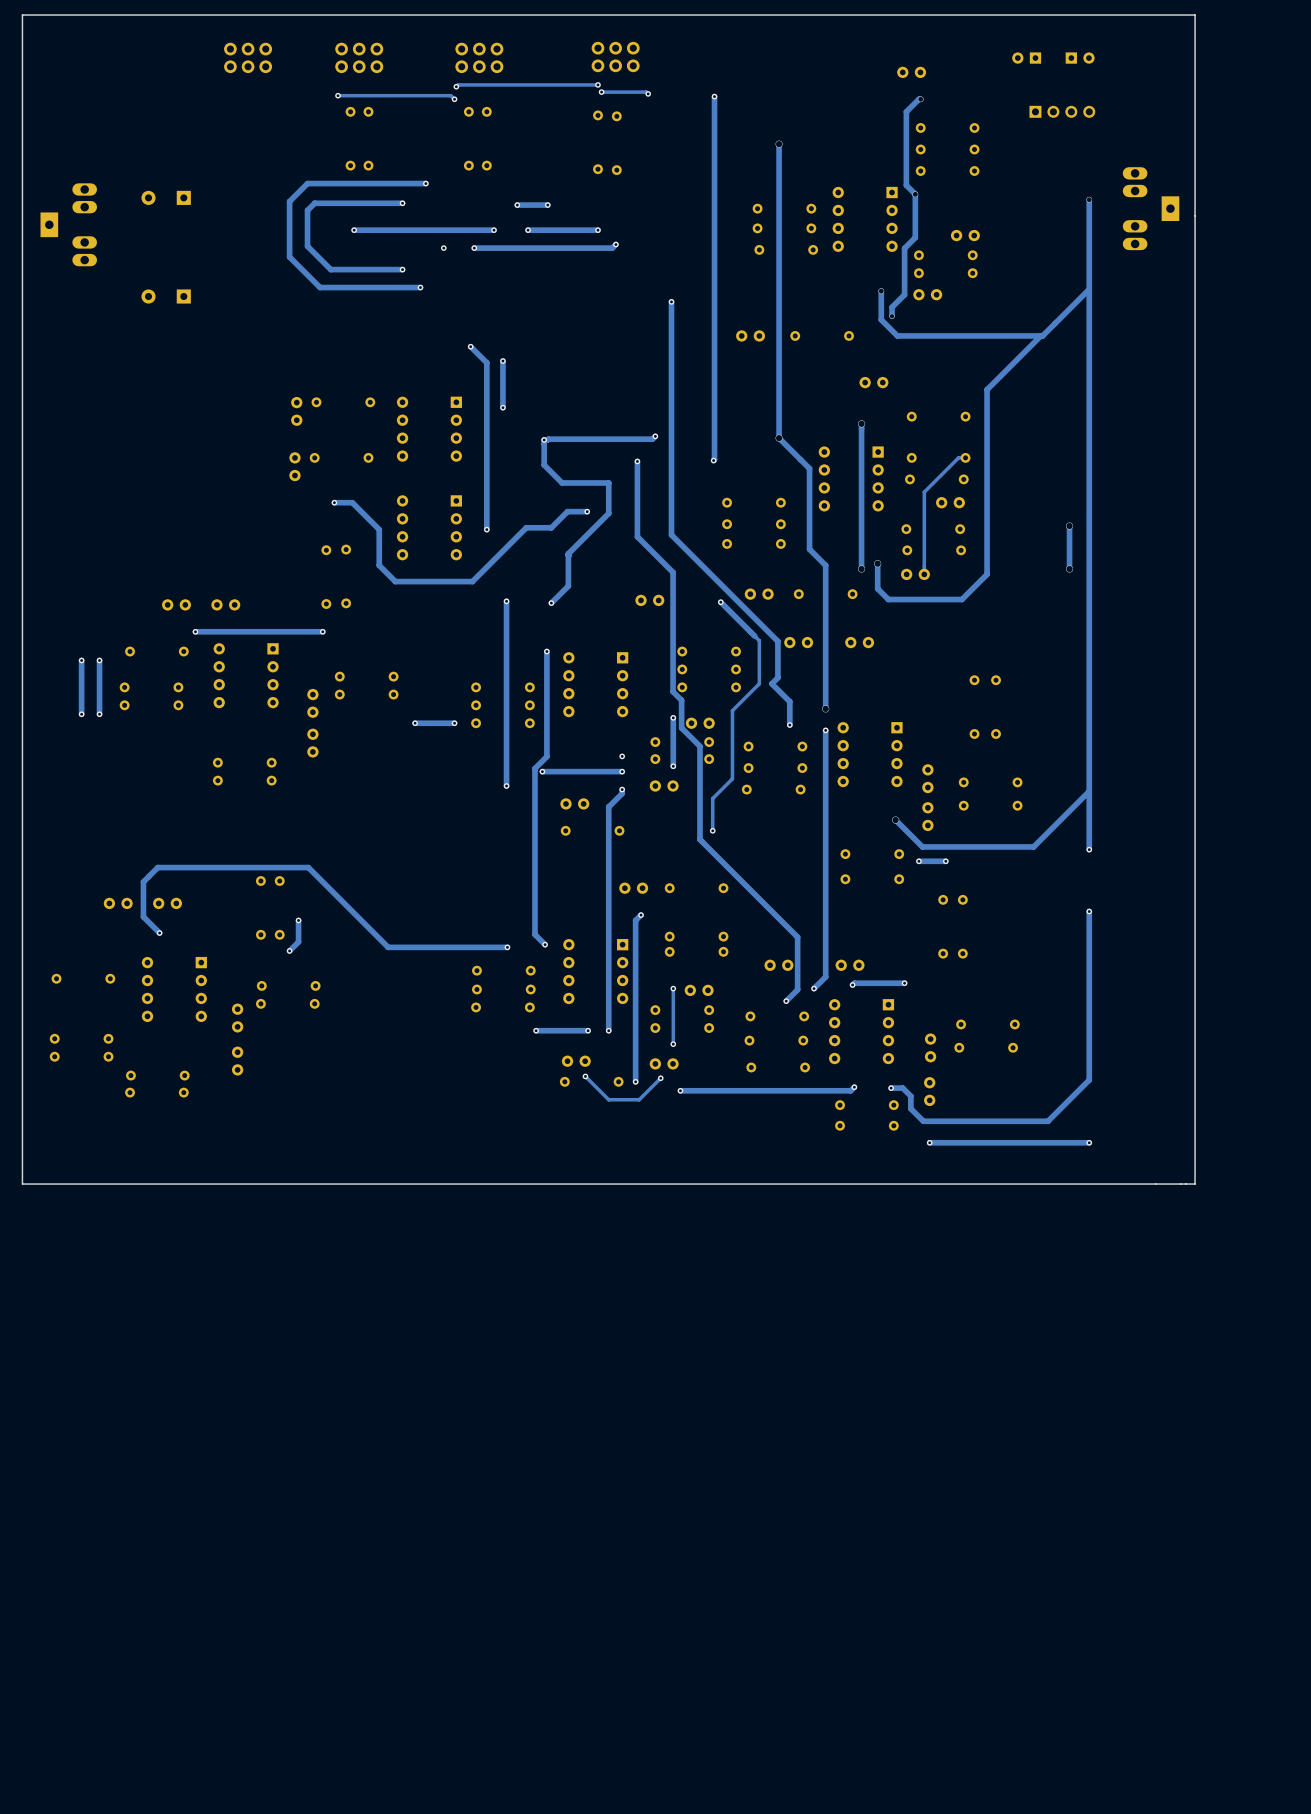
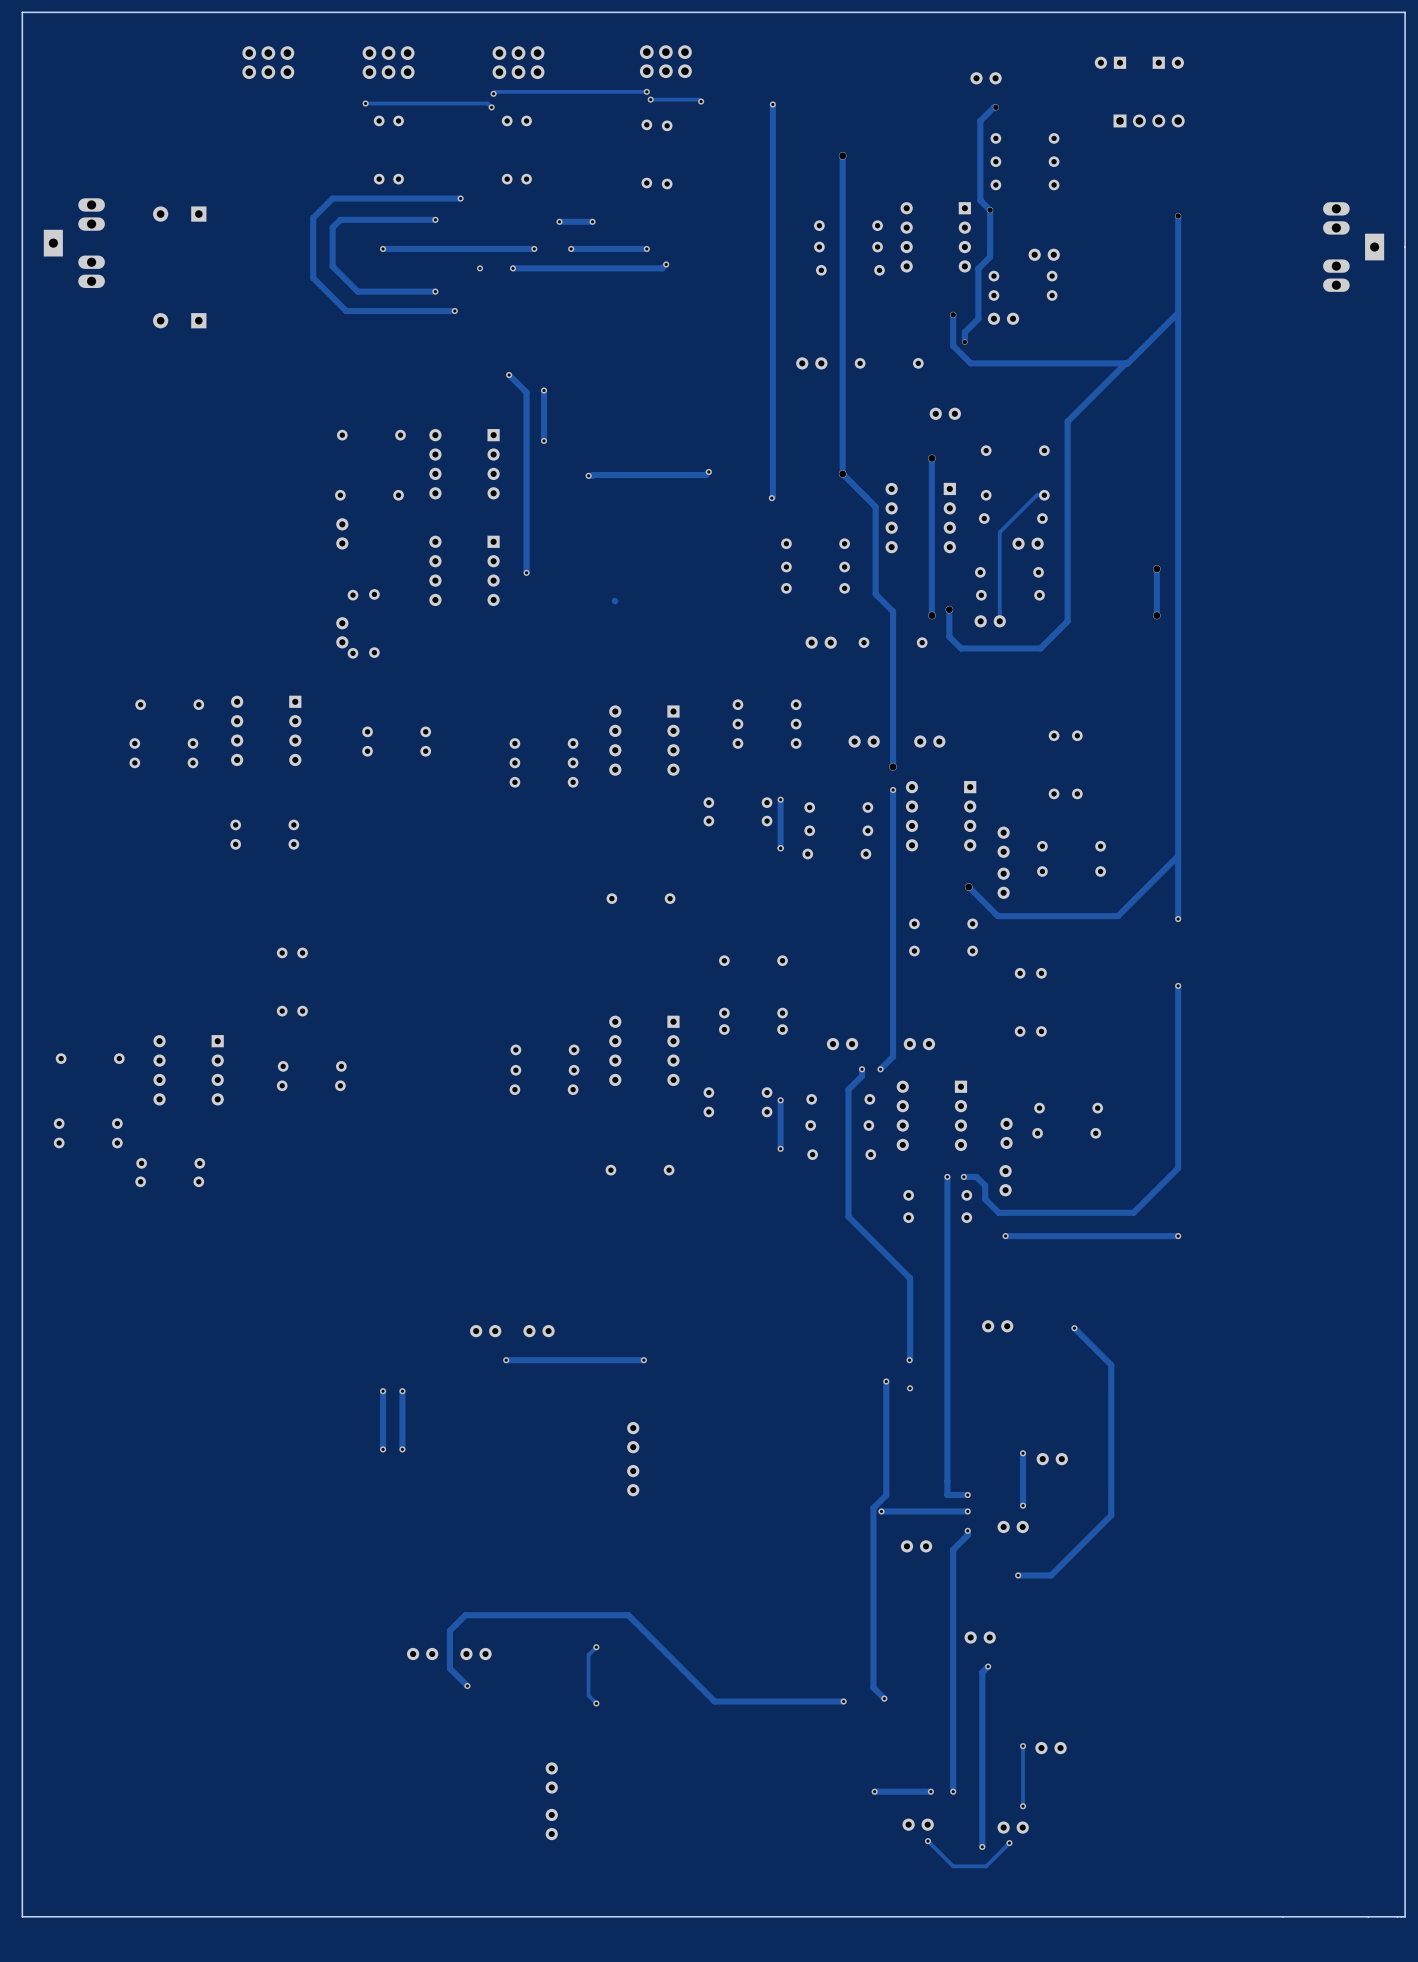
board edge: (1195, 15) (1195, 1184) (22, 1184) (22, 15) (1195, 15) -> (1405, 12) (1405, 1916) (22, 1916) (22, 12) (1405, 12)
part position: (1151, 208) -> (1353, 247)
track: (671, 301) (671, 534) (777, 641) (777, 677) (771, 683) (789, 701) (789, 725) -> none
via: (671, 301) -> none
part: (296, 411) -> none
track: (544, 439) (544, 465) (562, 482) (608, 482) (608, 513) (568, 553) (568, 586) (551, 603) -> none
track: (637, 461) (637, 536) (673, 572) (673, 691) (681, 700) (681, 727) (699, 746) (699, 839) (797, 937) (797, 989) (786, 1001) -> none
via: (637, 461) -> none
part position: (294, 466) -> (342, 533)
track: (334, 502) (352, 502) (379, 529) (379, 565) (395, 581) (472, 581) (526, 527) (551, 527) (567, 511) (587, 511) -> none
via: (334, 502) -> none
via: (587, 511) -> none
part: none -> (342, 632)
part: (649, 600) -> none
track: (506, 601) (506, 785) -> none
via: (506, 601) -> none
track: (720, 602) (754, 636) -> none
via: (720, 602) -> none
via: (551, 603) -> none
part: (176, 604) -> none
part: (225, 604) -> none
via: (195, 631) -> none
track: (322, 631) (195, 631) -> none
via: (322, 631) -> none
track: (750, 631) (759, 640) (759, 683) (732, 710) (732, 778) (712, 798) (712, 830) -> none
part: (798, 642) -> none
part: (859, 642) -> none
track: (546, 651) (546, 756) (534, 768) (534, 934) (545, 944) -> none
via: (546, 651) -> none
track: (81, 660) (81, 714) -> none
via: (81, 660) -> none
track: (99, 660) (99, 714) -> none
via: (99, 660) -> none
part: none -> (864, 741)
part: none -> (929, 741)
part: (312, 703) -> none
via: (81, 714) -> none
via: (99, 714) -> none
track: (673, 717) (673, 766) -> none
via: (673, 717) -> none
via: (415, 723) -> none
track: (454, 723) (415, 723) -> none
via: (454, 723) -> none
part: (700, 723) -> none
via: (789, 725) -> none
track: none -> (780, 799) (780, 848)
via: none -> (780, 799)
part: (312, 743) -> none
via: (622, 756) -> none
via: (673, 766) -> none
via: (542, 771) -> none
track: (622, 771) (542, 771) -> none
via: (622, 771) -> none
via: none -> (780, 848)
via: (506, 785) -> none
part: (664, 785) -> none
track: (622, 789) (622, 793) (608, 807) (608, 1030) -> none
via: (622, 789) -> none
part: (574, 803) -> none
via: (712, 830) -> none
via: (918, 861) -> none
track: (945, 861) (918, 861) -> none
via: (945, 861) -> none
part: (633, 888) -> none
part: (118, 903) -> none
part: (167, 903) -> none
track: (641, 915) (635, 920) (635, 1081) -> none
via: (641, 915) -> none
track: (298, 920) (298, 941) (289, 950) -> none
via: (298, 920) -> none
track: (159, 933) (143, 916) (143, 881) (157, 867) (308, 867) (388, 947) (507, 947) -> none
via: (159, 933) -> none
via: (545, 944) -> none
via: (507, 947) -> none
via: (289, 950) -> none
track: (904, 983) (854, 983) (852, 985) -> none
via: (904, 983) -> none
via: (852, 985) -> none
track: (673, 988) (673, 1044) -> none
via: (673, 988) -> none
track: none -> (862, 1069) (862, 1076) (848, 1089) (848, 1216) (910, 1278) (909, 1360)
part: (699, 990) -> none
via position: (786, 1001) -> (862, 1069)
track: none -> (780, 1100) (780, 1148)
via: none -> (780, 1100)
part: (237, 1018) -> none
via: (536, 1030) -> none
track: (588, 1030) (536, 1030) -> none
via: (588, 1030) -> none
via: (608, 1030) -> none
via: (673, 1044) -> none
part: (237, 1061) -> none
part: (576, 1061) -> none
via: none -> (780, 1148)
part: (664, 1063) -> none
track: (585, 1076) (608, 1099) (639, 1099) (660, 1078) -> none
via: (585, 1076) -> none
via: (660, 1078) -> none
via: (635, 1081) -> none
track: (854, 1087) (850, 1090) (680, 1090) -> none
via position: (854, 1087) -> (947, 1176)
track: none -> (947, 1176) (947, 1494) (967, 1494)
via: (680, 1090) -> none
part: none -> (997, 1326)
track: none -> (1074, 1328) (1111, 1365) (1111, 1515) (1051, 1575) (1018, 1575)
via: none -> (1074, 1328)
part: none -> (485, 1331)
part: none -> (539, 1331)
via: none -> (506, 1360)
track: none -> (643, 1360) (506, 1360)
via: none -> (643, 1360)
via: none -> (909, 1360)
track: none -> (886, 1381) (886, 1495) (873, 1508) (873, 1687) (884, 1698)
via: none -> (886, 1381)
via: none -> (910, 1388)
track: none -> (383, 1391) (383, 1449)
via: none -> (383, 1391)
track: none -> (402, 1391) (402, 1449)
via: none -> (402, 1391)
part: none -> (633, 1437)
via: none -> (383, 1449)
via: none -> (402, 1449)
track: none -> (1023, 1453) (1023, 1505)
via: none -> (1023, 1453)
part: none -> (1052, 1459)
part: none -> (633, 1480)
via: none -> (967, 1494)
via: none -> (1023, 1505)
via: none -> (881, 1511)
track: none -> (967, 1511) (881, 1511)
via: none -> (967, 1511)
part: none -> (1013, 1526)
track: none -> (967, 1530) (967, 1535) (953, 1549) (953, 1791)
via: none -> (967, 1530)
part: none -> (916, 1546)
via: none -> (1018, 1575)
part: none -> (980, 1637)
track: none -> (596, 1647) (588, 1655) (588, 1695) (596, 1703)
via: none -> (596, 1647)
part: none -> (422, 1654)
part: none -> (475, 1654)
track: none -> (988, 1666) (982, 1672) (982, 1846)
via: none -> (988, 1666)
track: none -> (467, 1686) (449, 1668) (449, 1630) (465, 1615) (628, 1615) (714, 1701) (843, 1701)
via: none -> (467, 1686)
via: none -> (884, 1698)
via: none -> (843, 1701)
via: none -> (596, 1703)
track: none -> (1023, 1746) (1023, 1806)
via: none -> (1023, 1746)
part: none -> (1051, 1748)
part: none -> (551, 1777)
via: none -> (874, 1791)
track: none -> (930, 1791) (874, 1791)
via: none -> (930, 1791)
via: none -> (953, 1791)
via: none -> (1023, 1806)
part: none -> (551, 1824)
part: none -> (918, 1824)
part: none -> (1013, 1827)
track: none -> (928, 1841) (953, 1866) (986, 1866) (1009, 1843)
via: none -> (928, 1841)
via: none -> (1009, 1843)
via: none -> (982, 1846)

